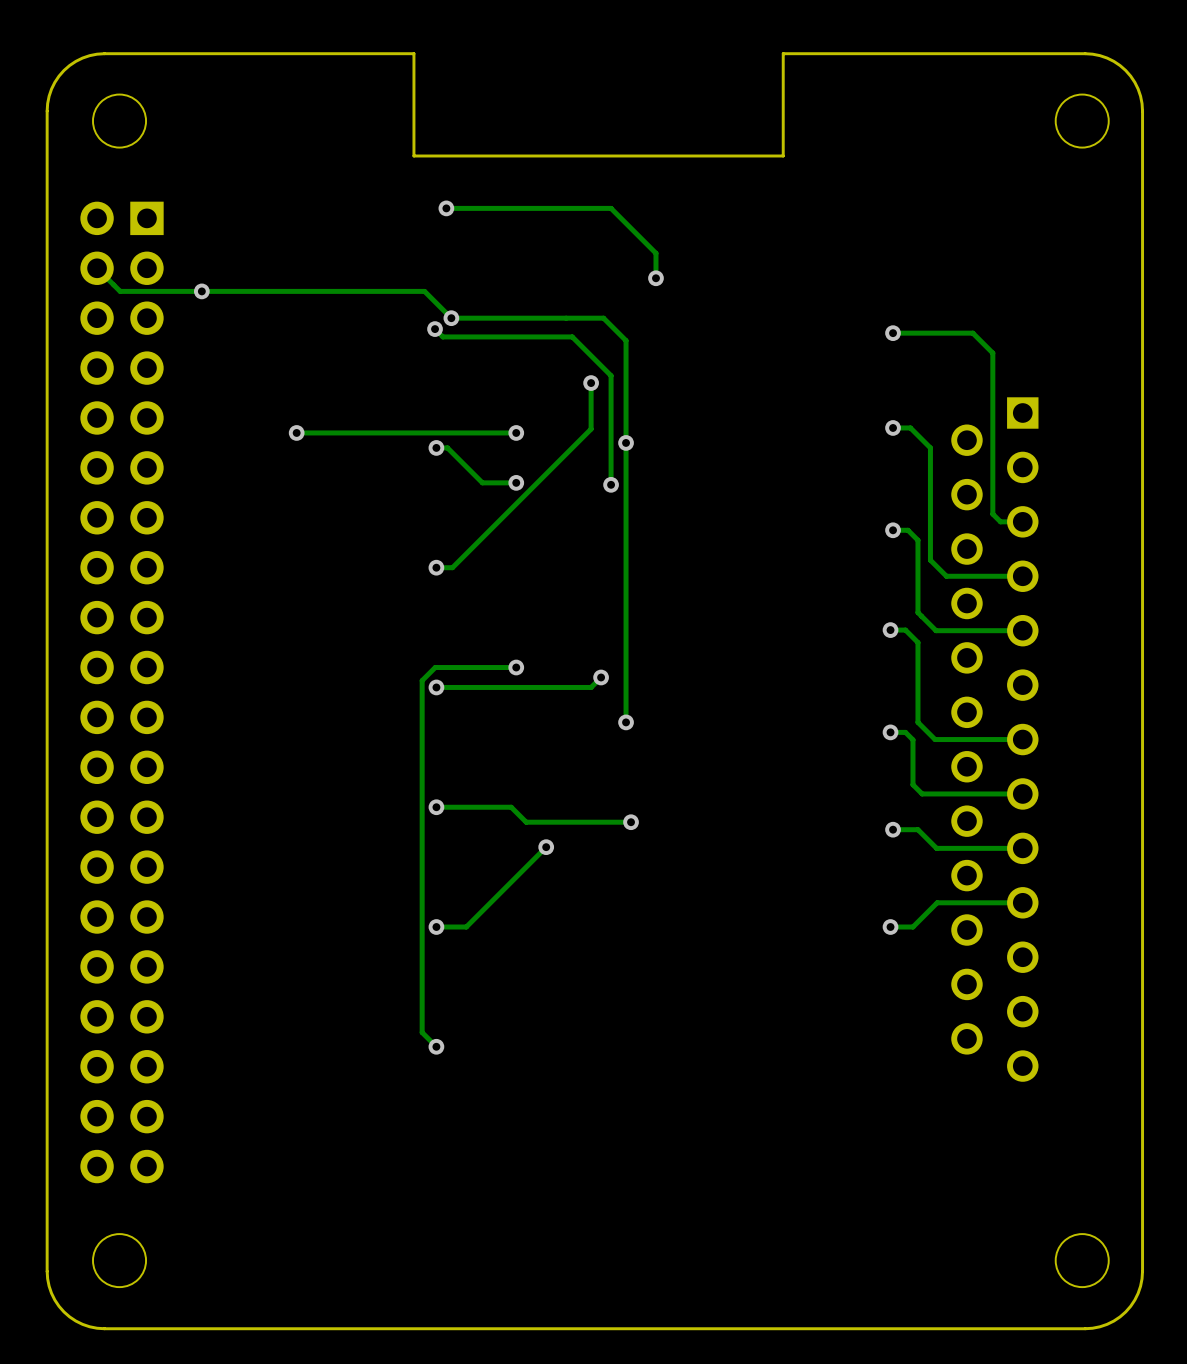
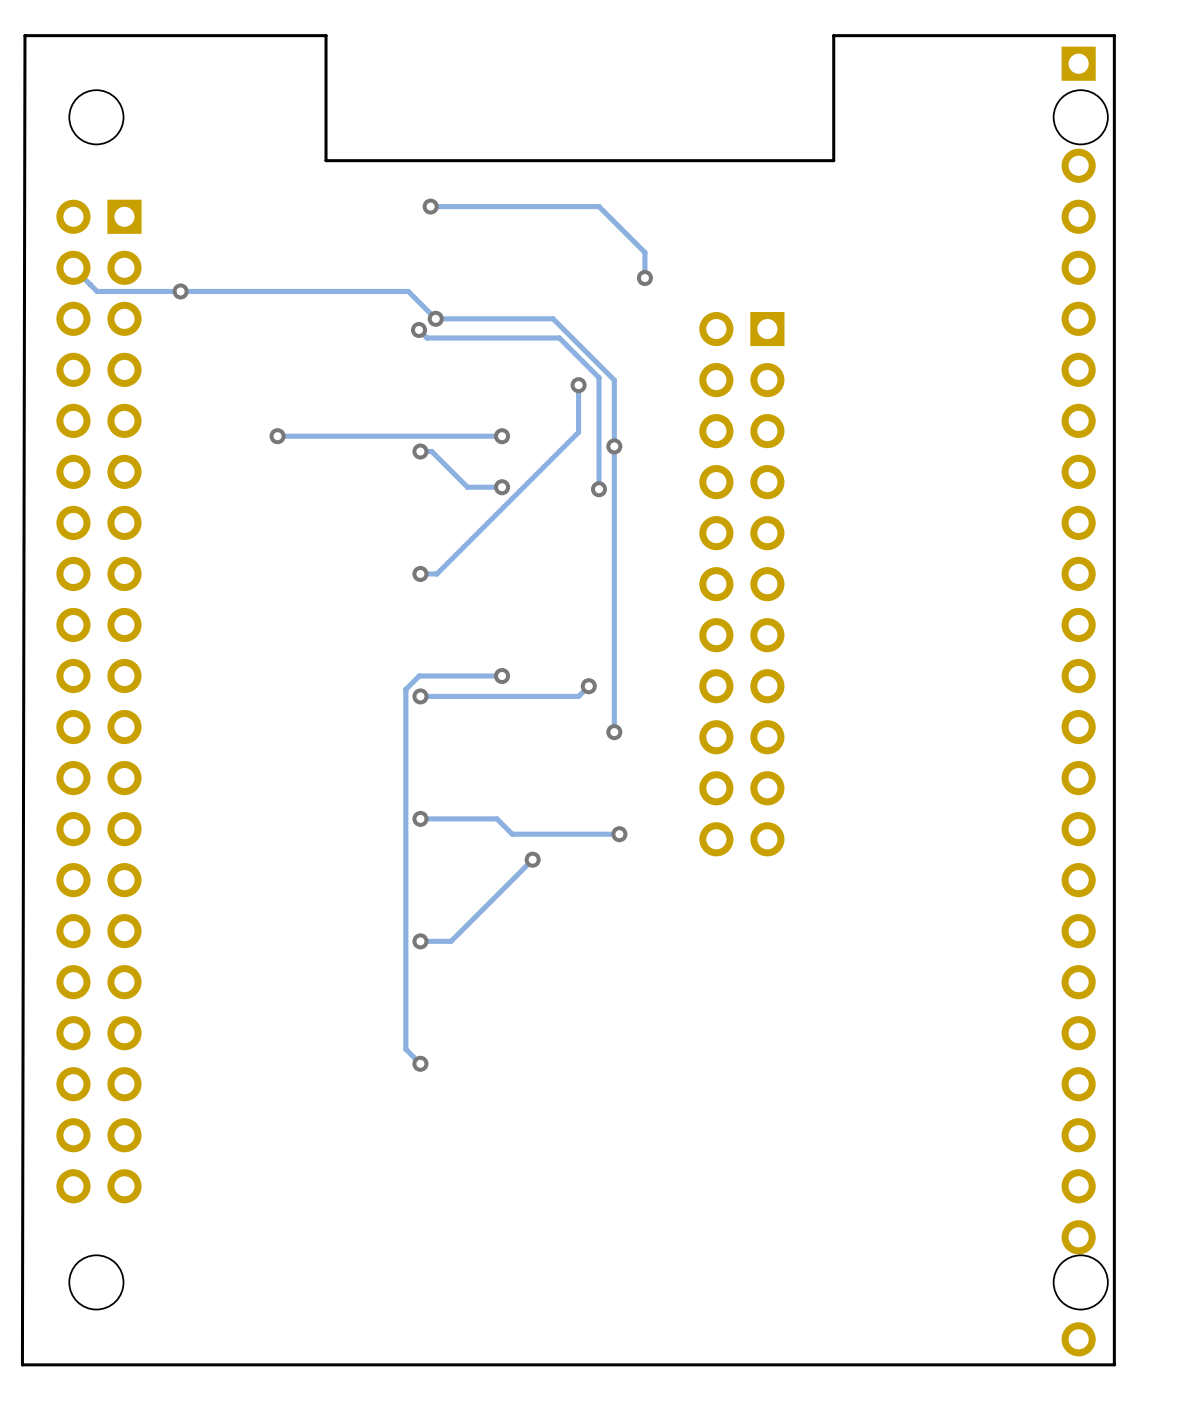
board edge: (1085, 53) (783, 53) (783, 155) (413, 155) (413, 53) (104, 53) (89, 55) (75, 61) (59, 76) (51, 89) (47, 111) (47, 1271) (49, 1286) (54, 1300) (69, 1316) (82, 1324) (104, 1328) (1085, 1328) (1107, 1324) (1120, 1316) (1130, 1306) (1140, 1286) (1142, 1271) (1142, 111) (1138, 89) (1125, 70) (1107, 58) (1085, 53) -> (1114, 35) (1114, 1364) (22, 1364) (24, 35) (326, 35) (326, 160) (833, 160) (833, 35) (1114, 35)
track: (566, 318) (603, 318) (626, 340) (626, 378) -> (553, 318) (614, 380)
track: (893, 333) (972, 333) (992, 353) (992, 514) (1000, 521) (1022, 521) -> none
via: (893, 333) -> none
track: (893, 427) (910, 427) (930, 447) (930, 560) (946, 576) (1022, 576) -> none
via: (893, 427) -> none
track: (893, 530) (907, 530) (917, 540) (917, 612) (936, 630) (1022, 630) -> none
via: (893, 530) -> none
part: none -> (741, 584)
track: (890, 630) (905, 630) (917, 642) (917, 722) (935, 739) (1022, 739) -> none
via: (890, 630) -> none
part: none -> (1078, 701)
track: (890, 732) (905, 732) (912, 739) (912, 784) (922, 793) (1022, 793) -> none
via: (890, 732) -> none
part: (994, 739) -> none
track: (893, 829) (917, 829) (936, 848) (1022, 848) -> none
via: (893, 829) -> none
track: (1022, 902) (937, 902) (912, 927) (890, 927) -> none
via: (890, 927) -> none

